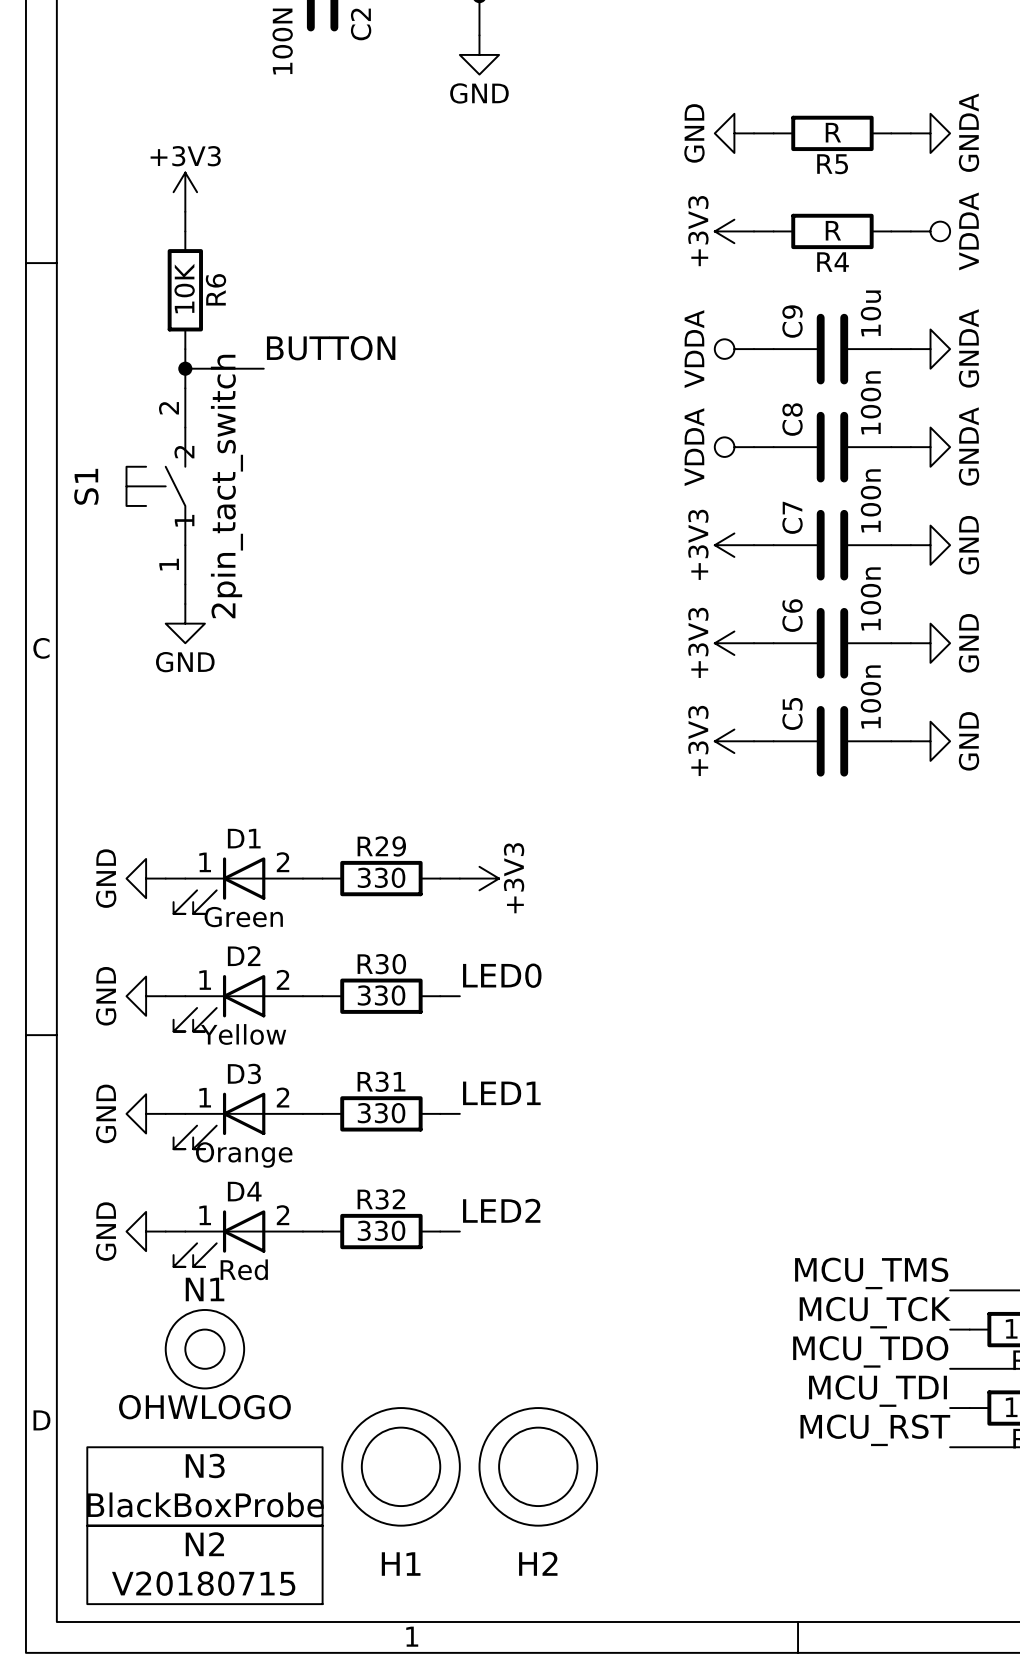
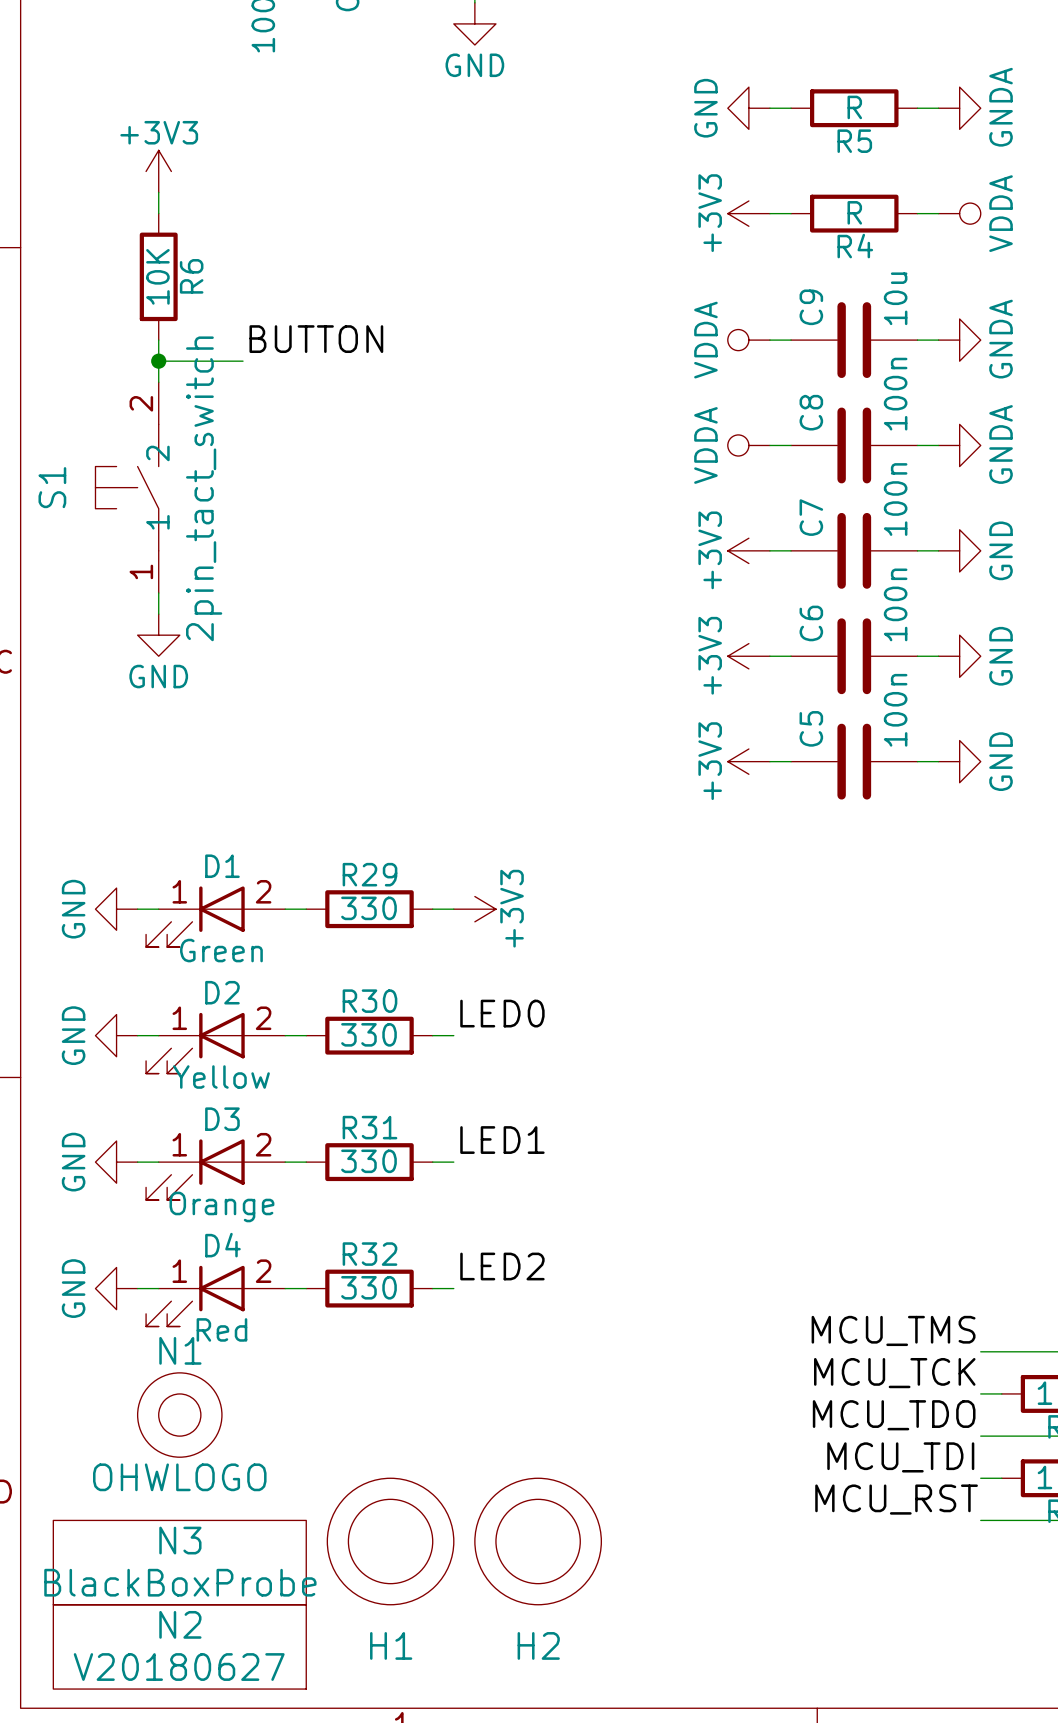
N2 value: V20180715 (203, 1583) -> V20180627 (179, 1667)

